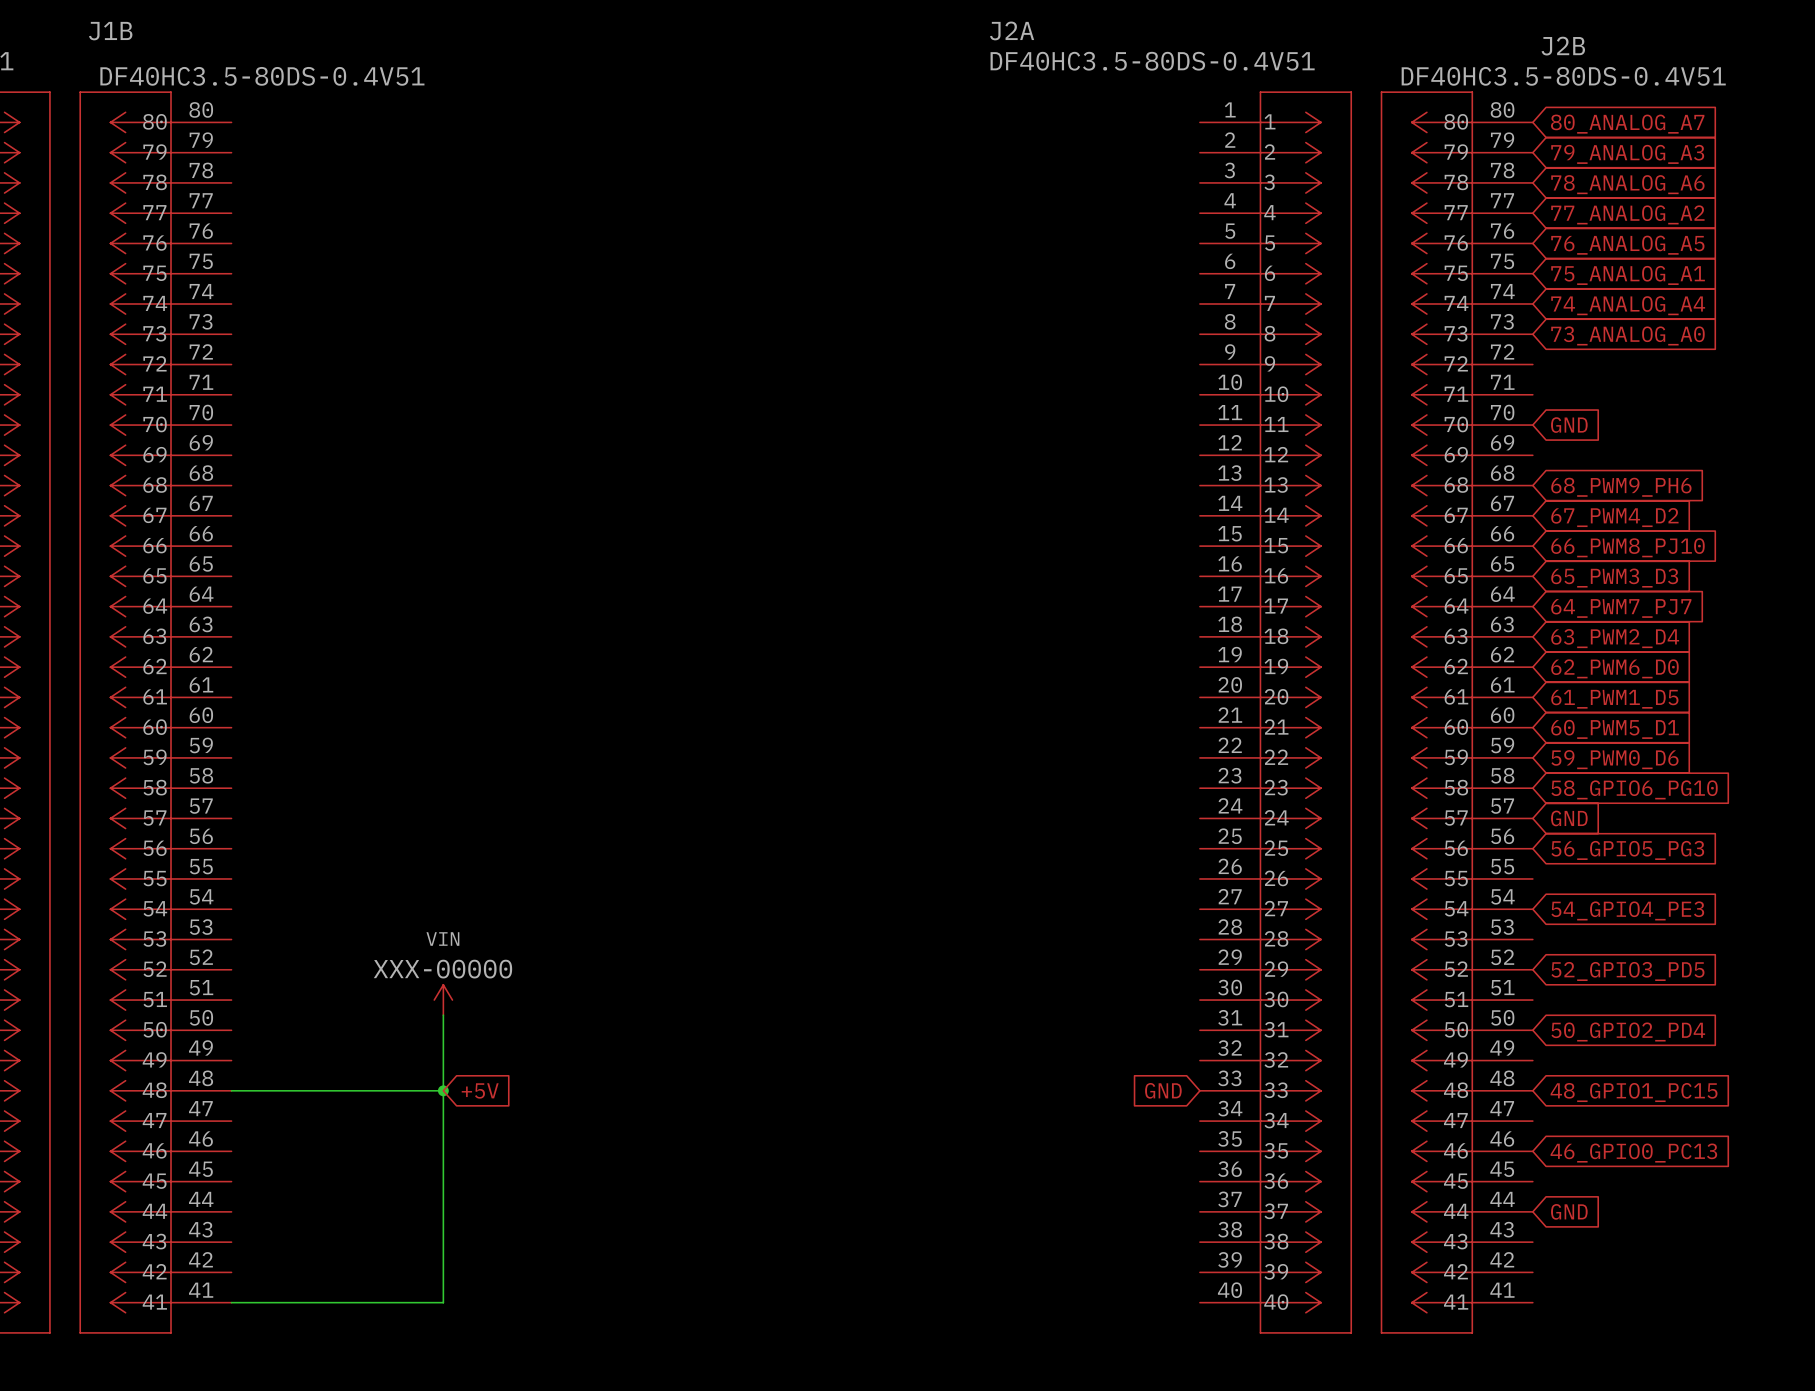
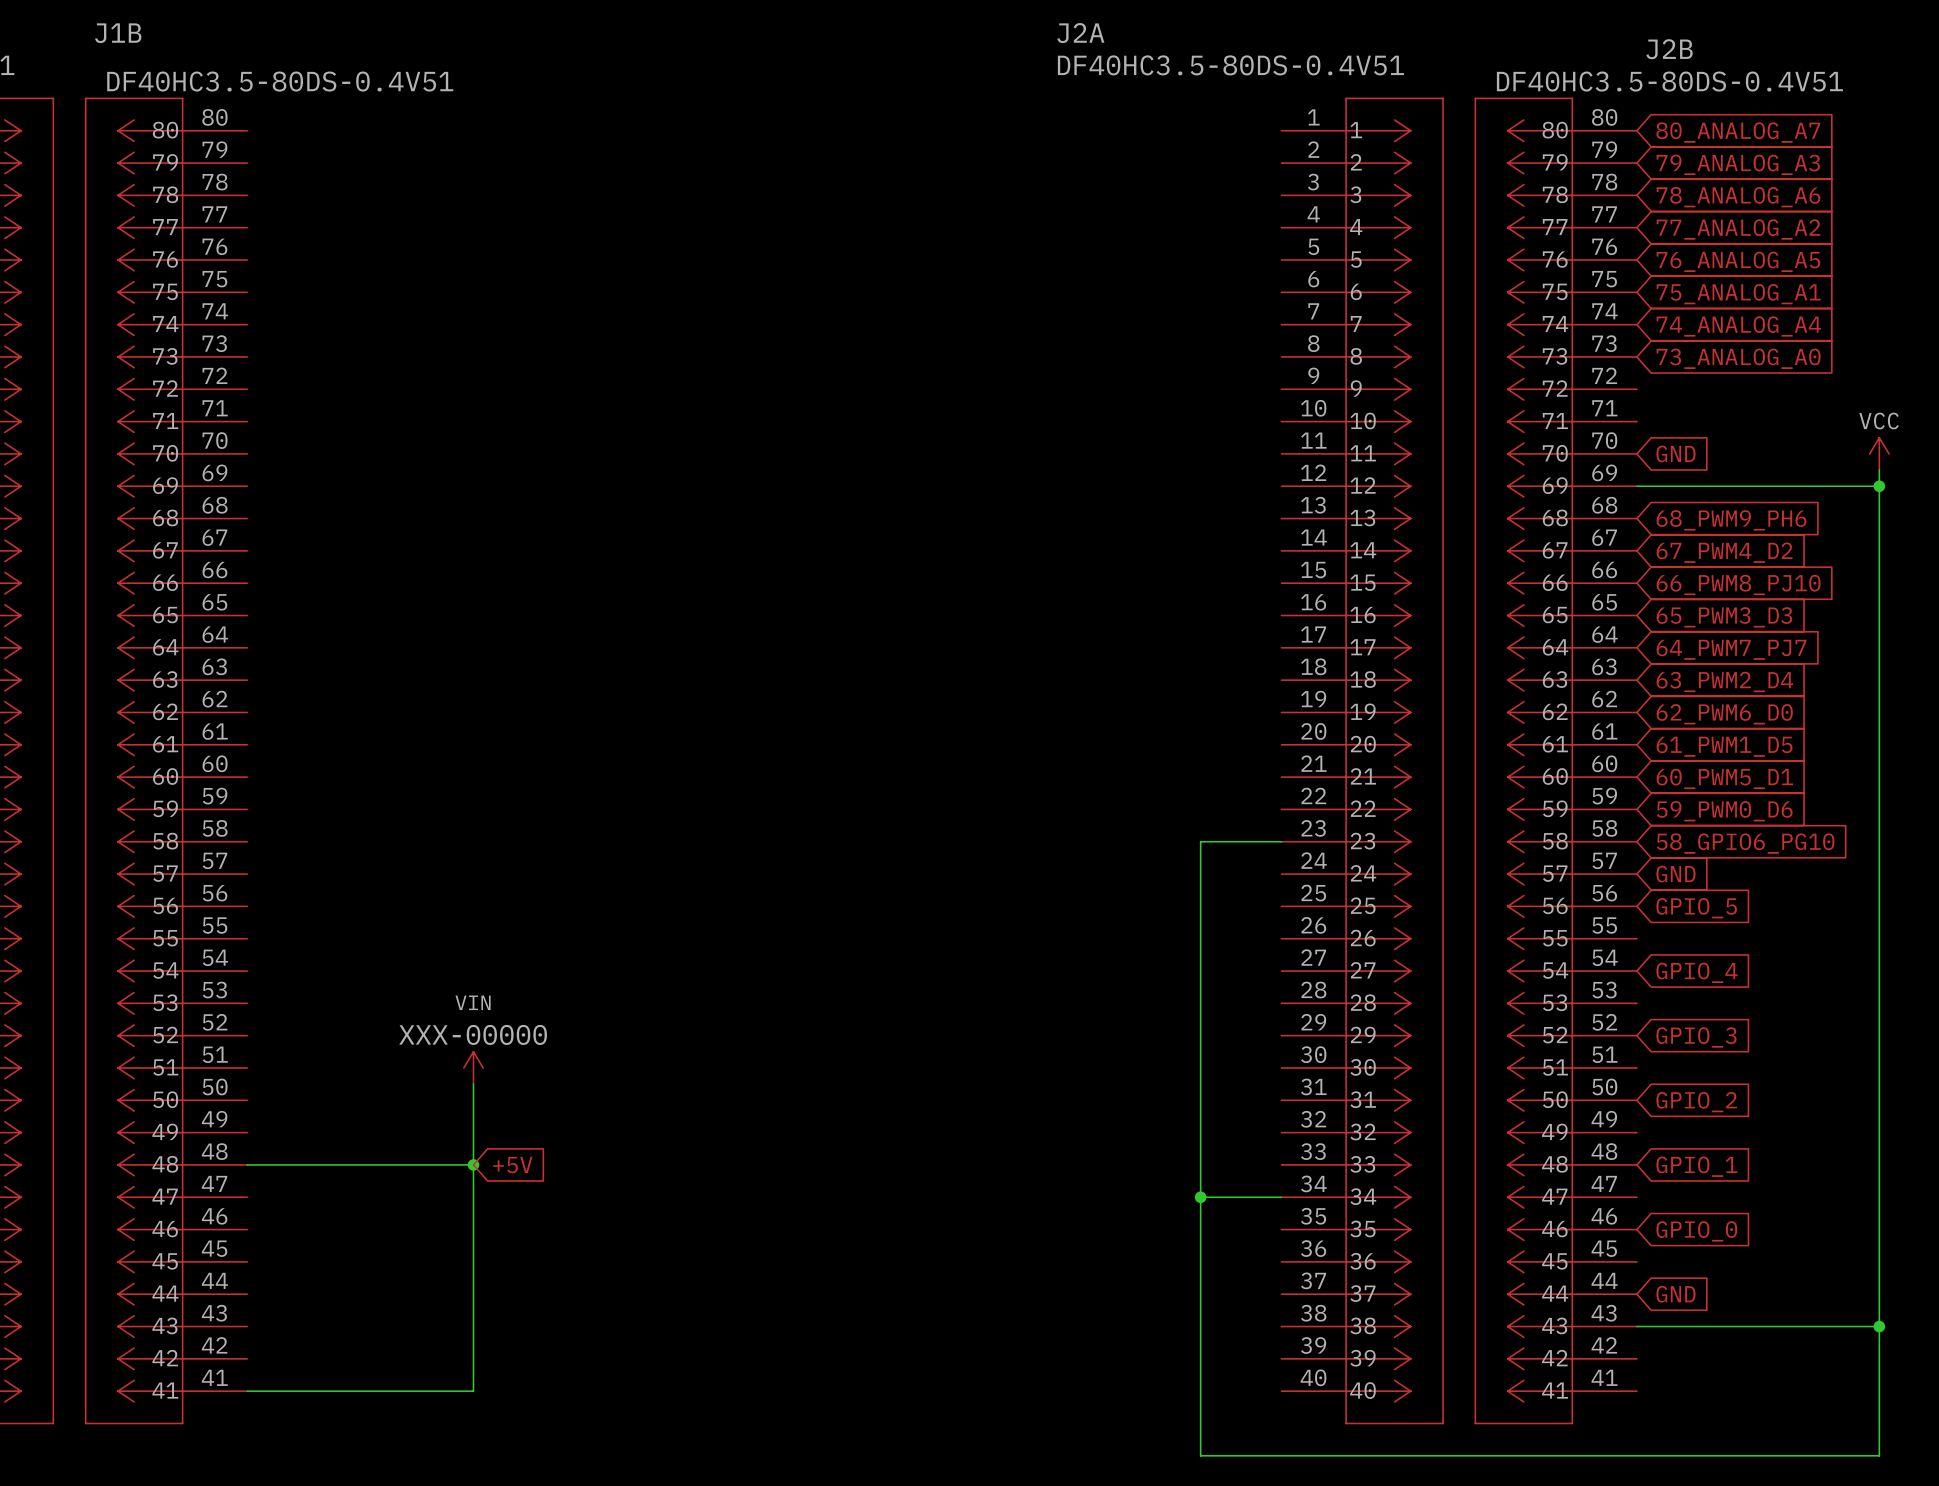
power symbol: none -> VCC (1879, 453)
wire: none -> (1879, 470) (1879, 1455) (1200, 1455) (1200, 841) (1281, 841)
wire: none -> (1636, 486) (1879, 486)
junction: none -> (1879, 486)
global label: 56_GPIO5_PG3 (1627, 850) -> GPIO_5 (1696, 908)
global label: 54_GPIO4_PE3 (1627, 910) -> GPIO_4 (1697, 972)
global label: 52_GPIO3_PD5 (1627, 971) -> GPIO_3 (1696, 1037)
global label: 50_GPIO2_PD4 (1628, 1032) -> GPIO_2 (1696, 1102)
global label: GND (1163, 1090) -> none
global label: 48_GPIO1_PC15 (1634, 1092) -> GPIO_1 (1696, 1166)
wire: none -> (1200, 1197) (1281, 1197)
junction: none -> (1200, 1197)
global label: 46_GPIO0_PC13 (1633, 1153) -> GPIO_0 (1696, 1231)
wire: none -> (1636, 1326) (1879, 1326)
junction: none -> (1879, 1326)

